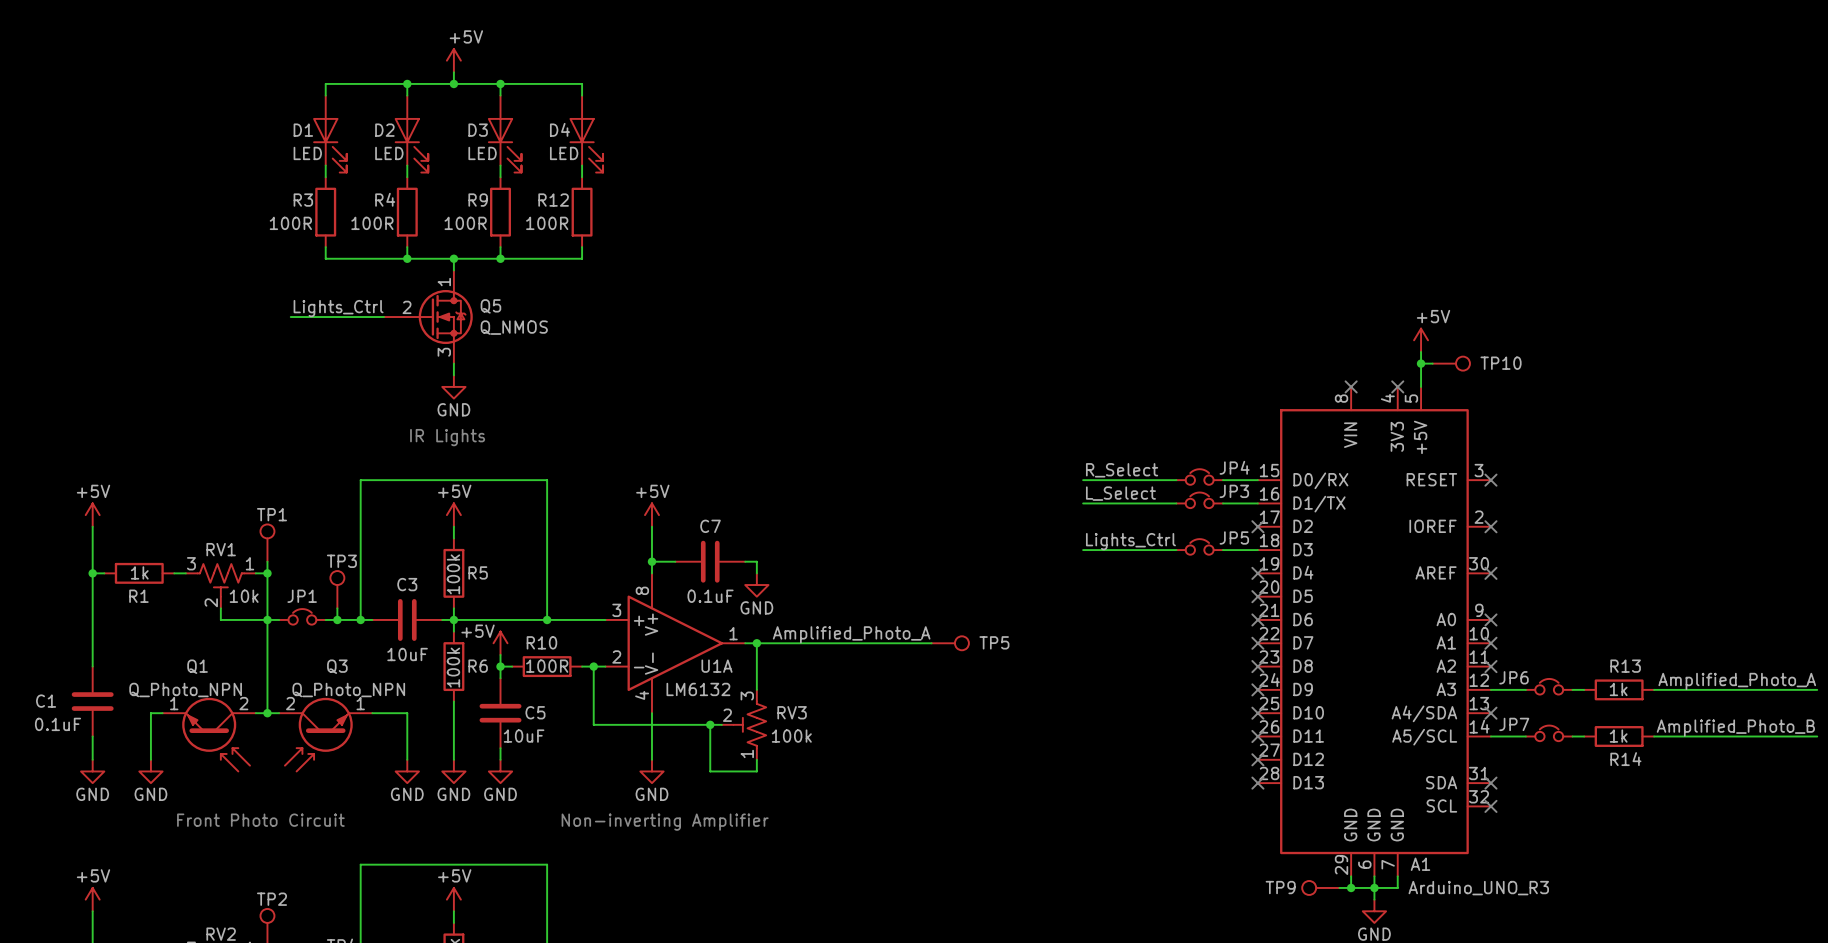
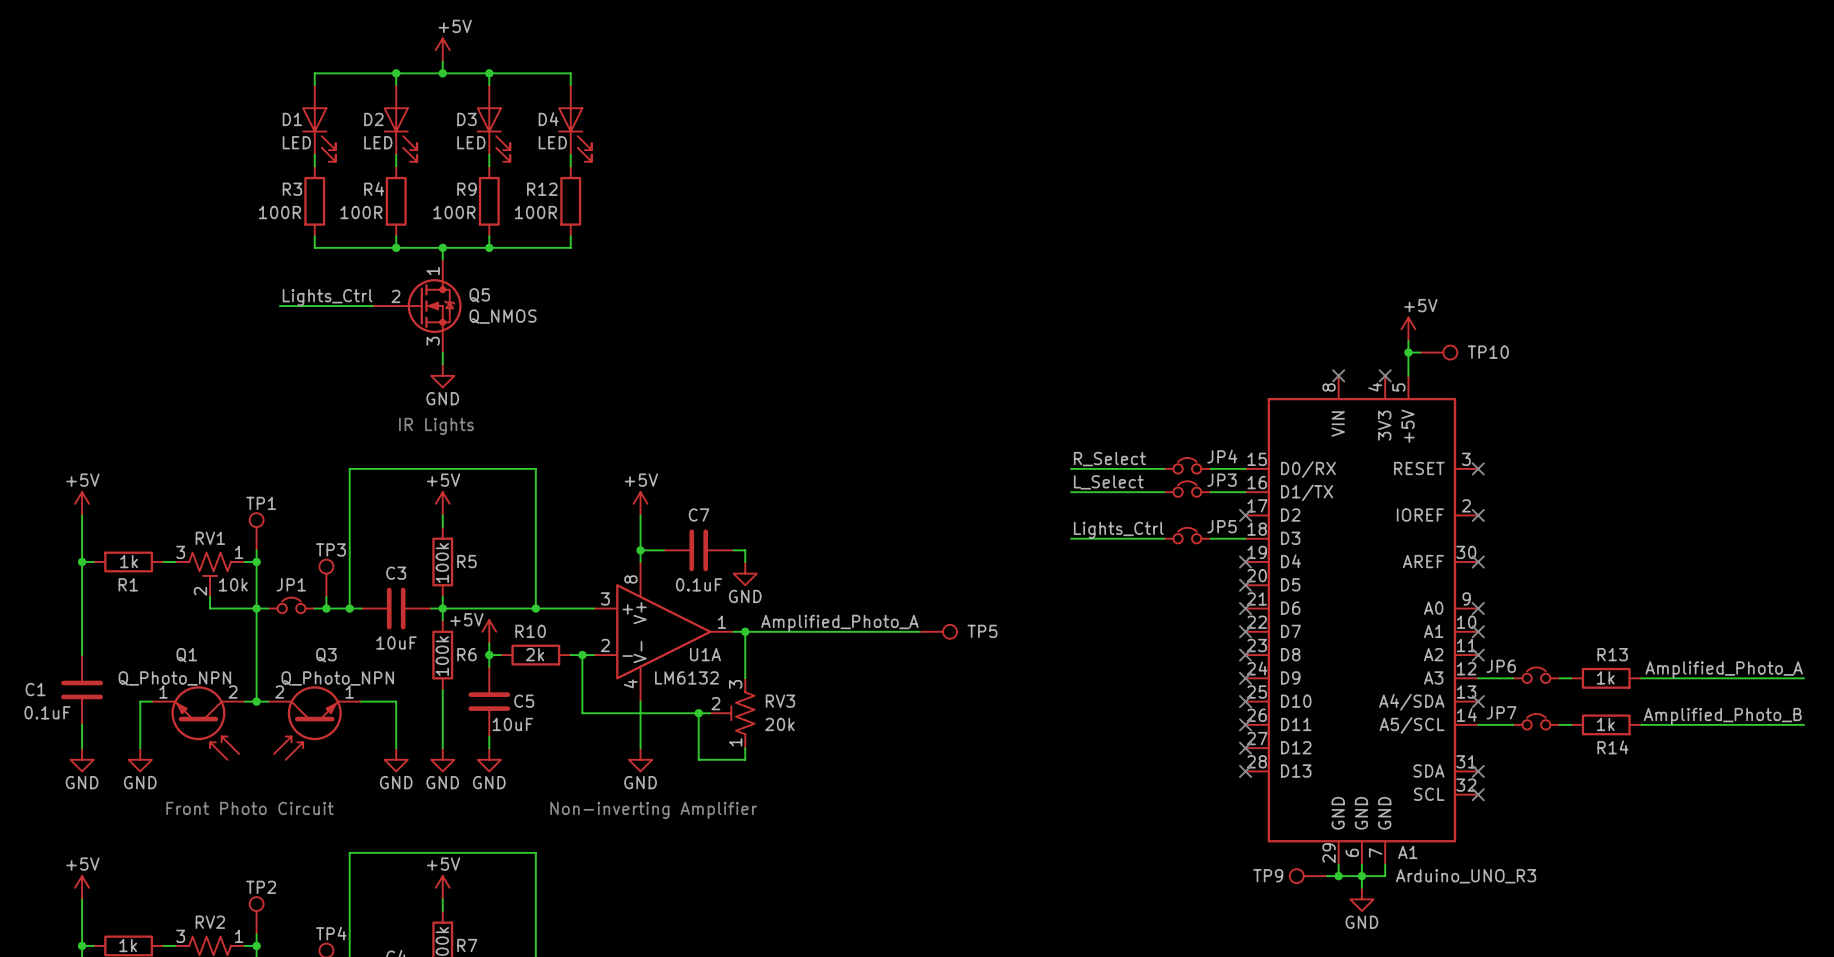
R10 value: 100R (547, 666) -> 2k (535, 654)
RV3 value: 100k (791, 736) -> 20k (779, 724)

